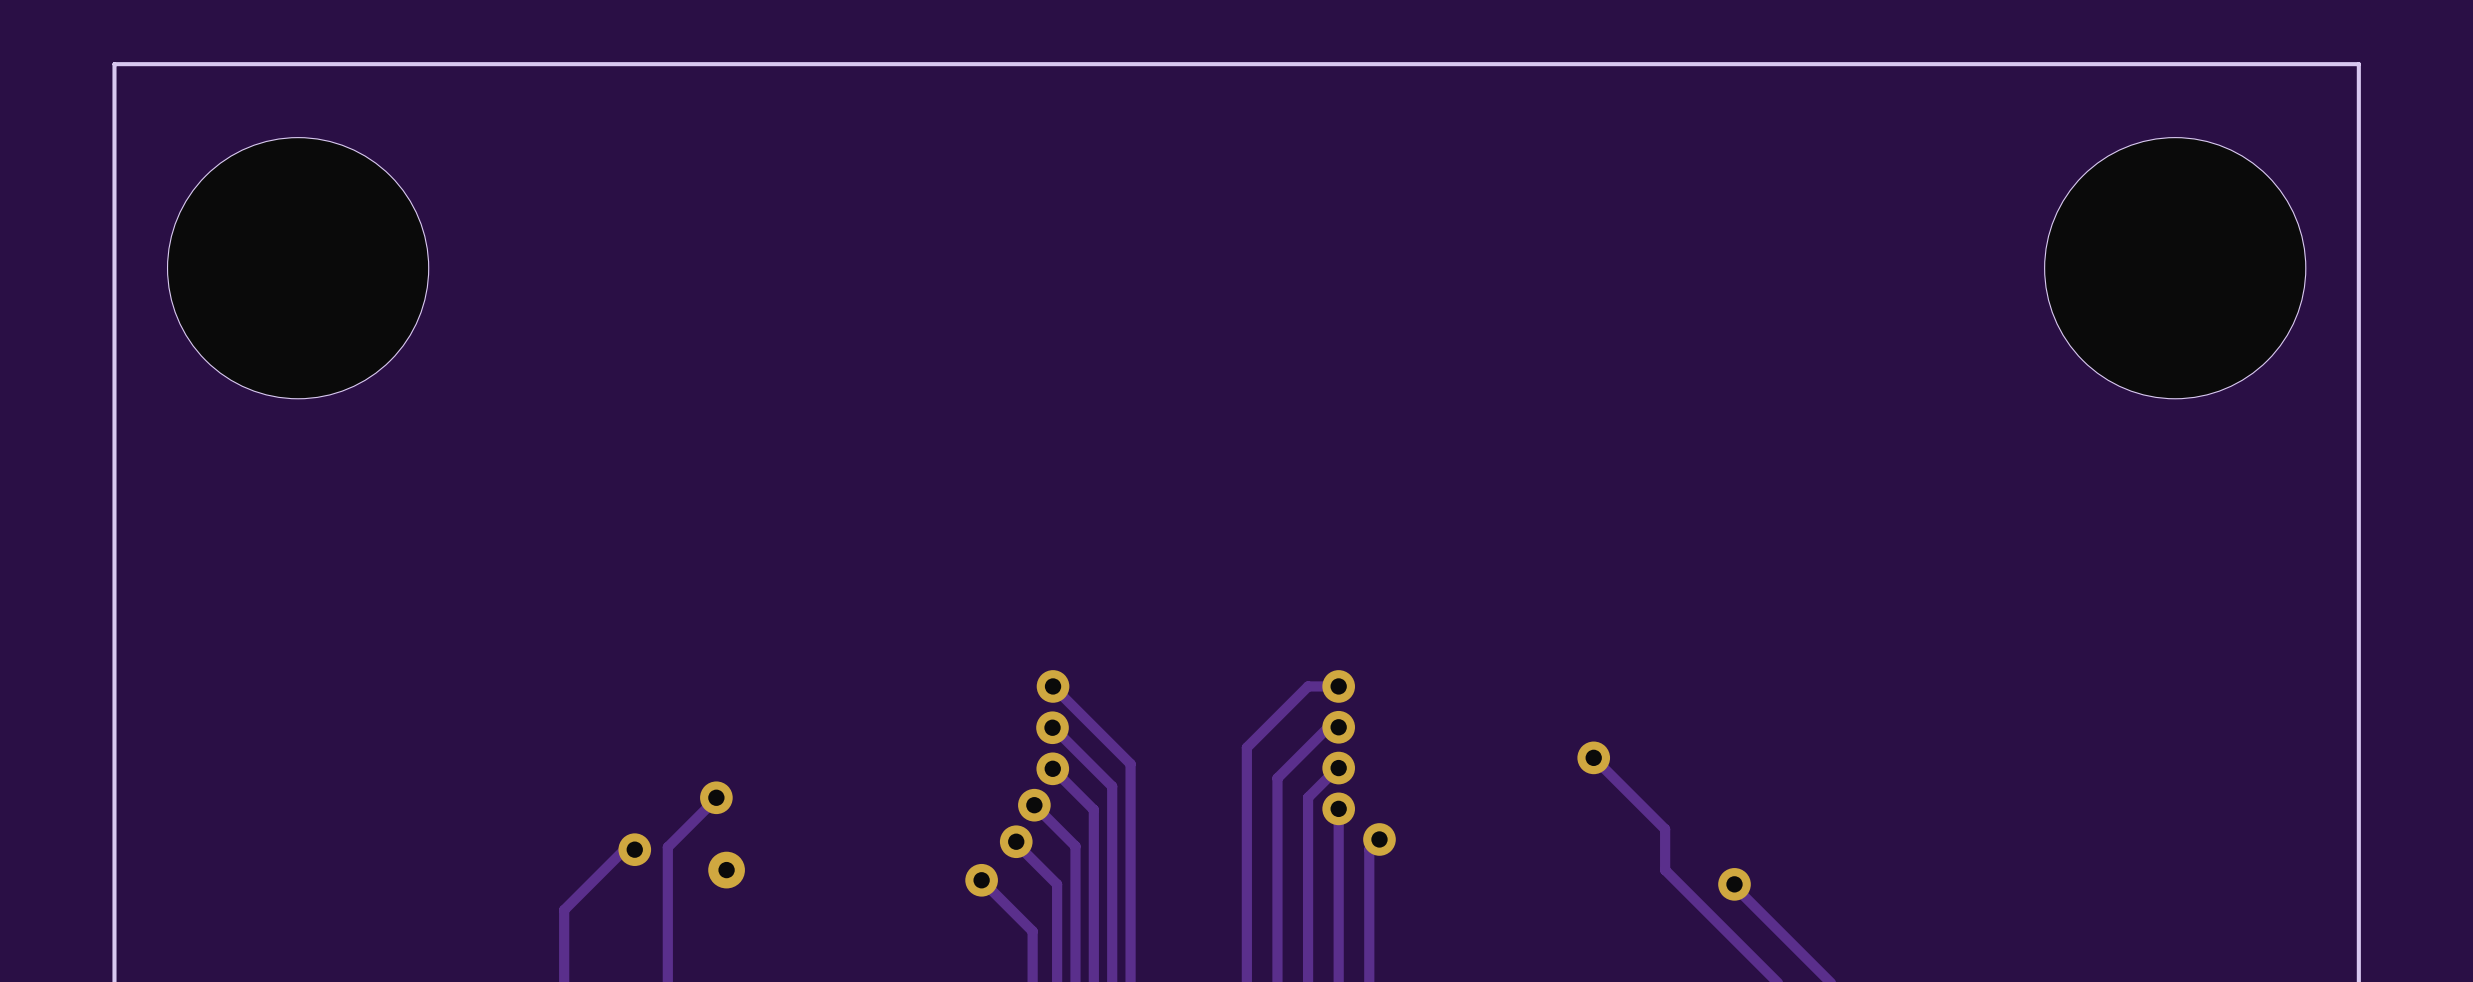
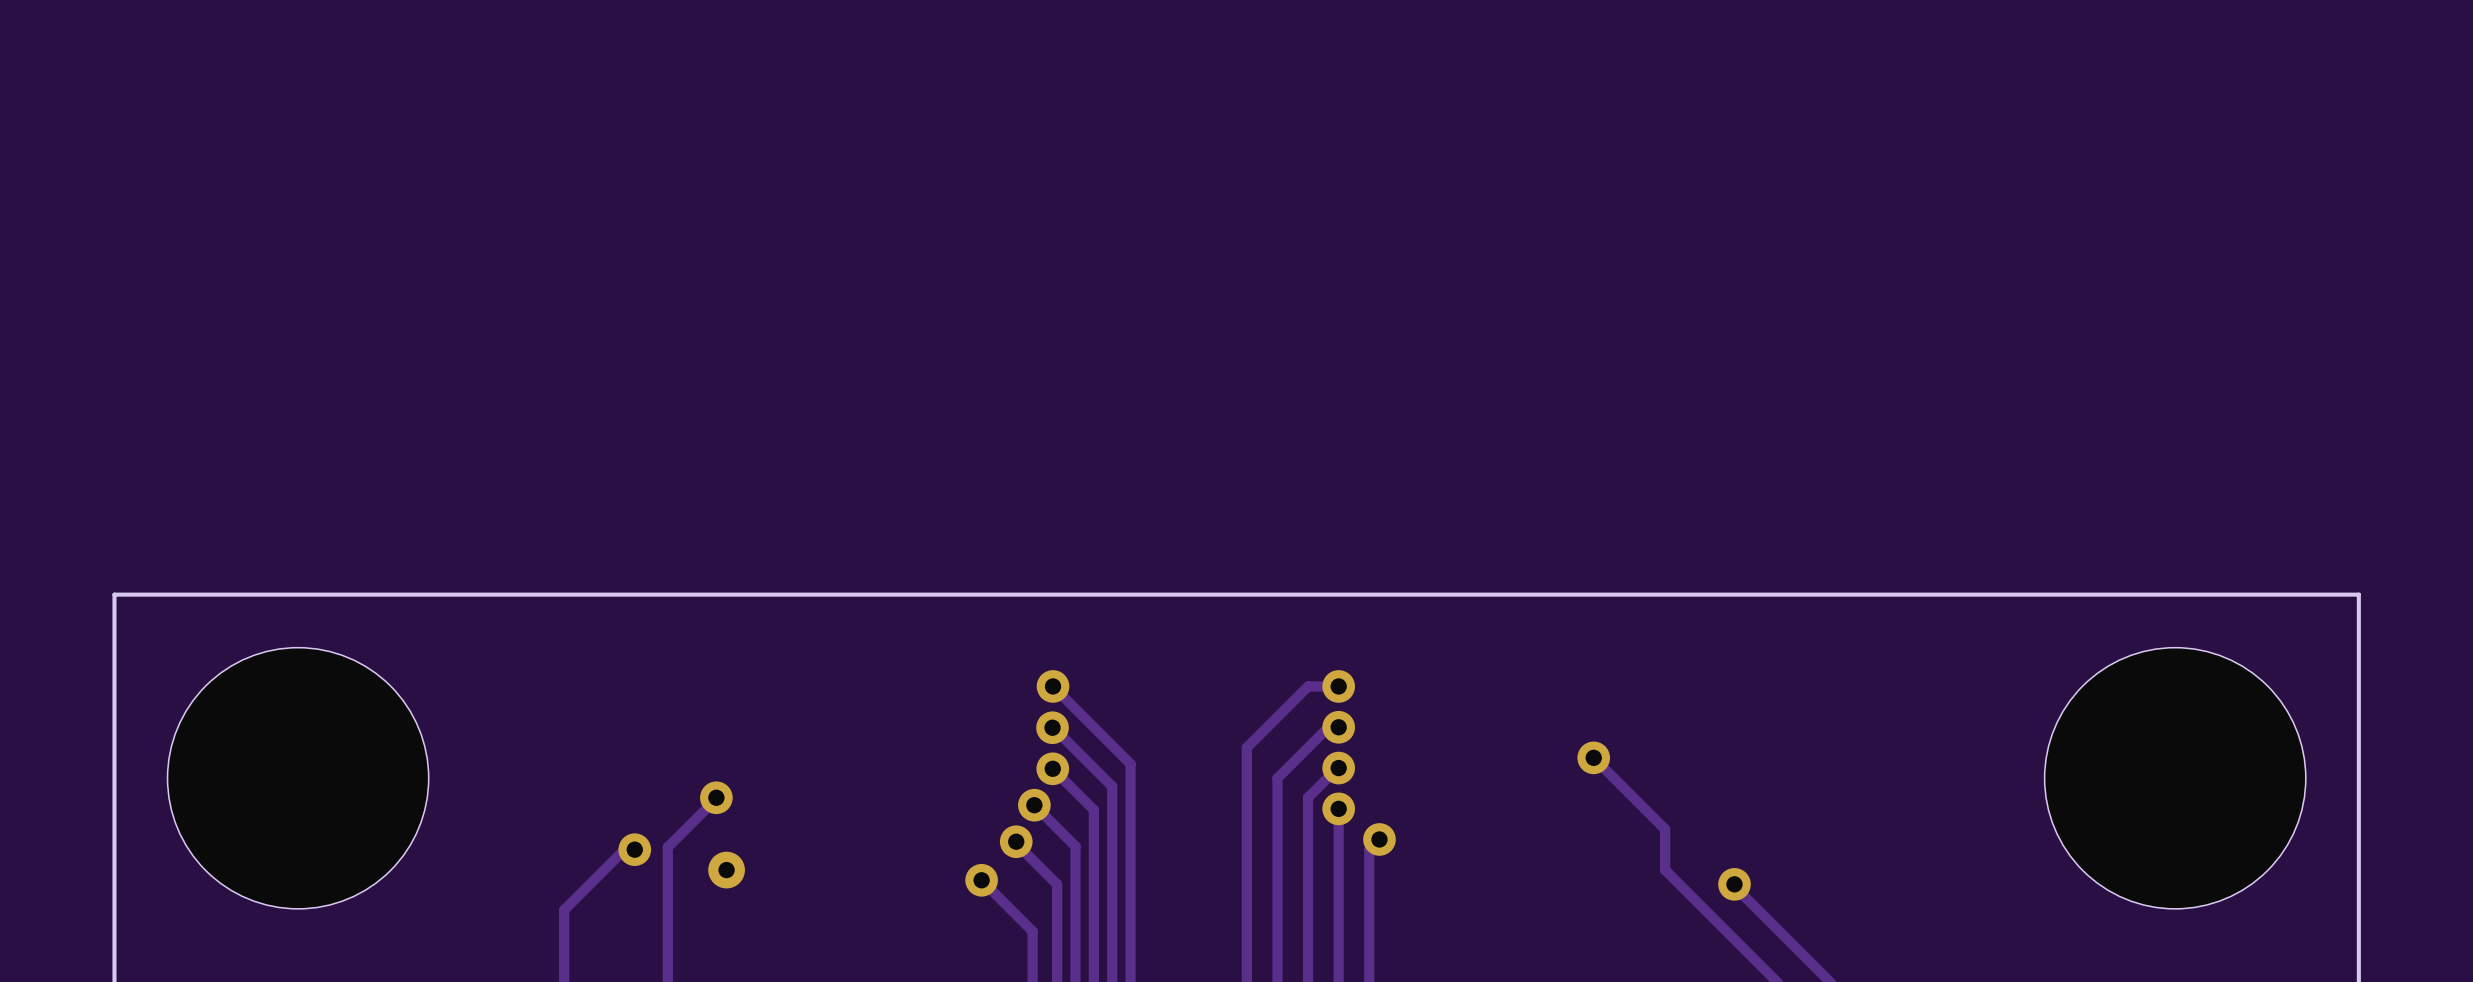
part position: (298, 268) -> (298, 778)
part position: (2175, 268) -> (2175, 778)
board edge: (2358, 594) (2358, 64) (114, 64) (114, 594) -> (2358, 594) (114, 594)

